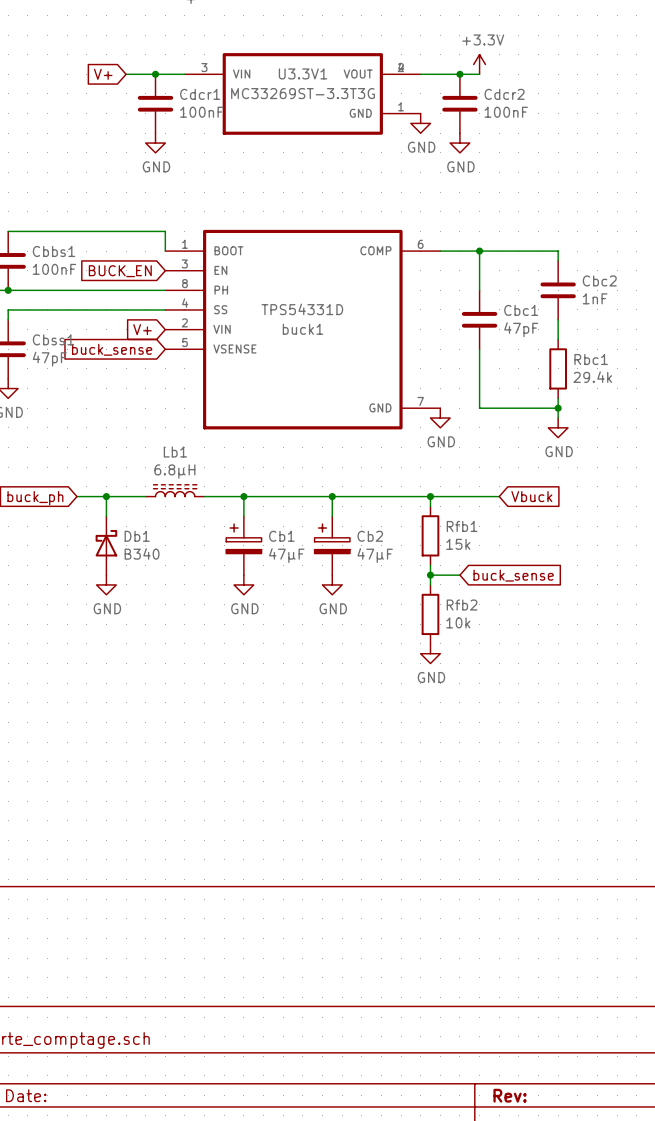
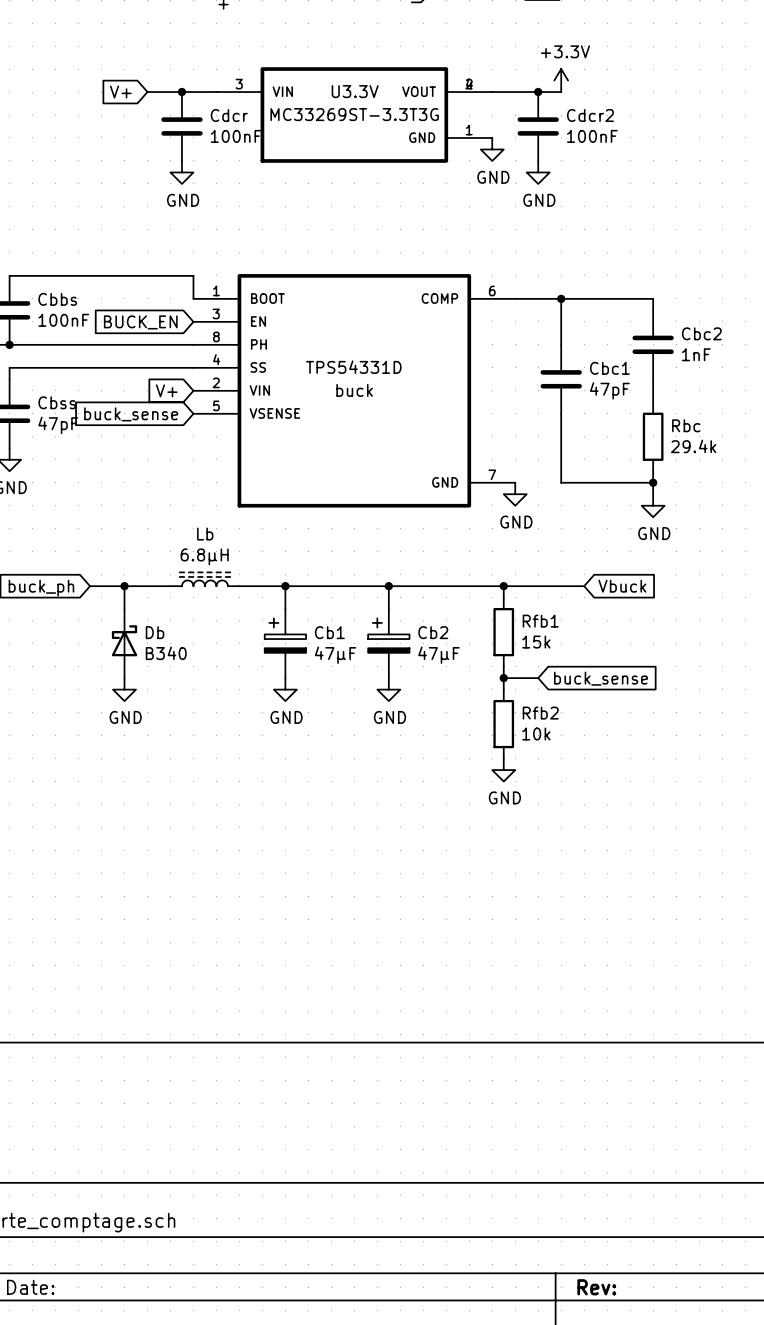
U3.3V1 name: U3.3V1 (303, 73) -> U3.3V (355, 91)
Cdcr1 name: Cdcr1 (200, 94) -> Cdcr (229, 115)
Cbbs1 name: Cbbs1 (54, 251) -> Cbbs (57, 299)
buck1 name: buck1 (303, 329) -> buck (354, 390)
Cbss1 name: Cbss1 (53, 339) -> Cbss (57, 402)
Rbc1 name: Rbc1 (591, 359) -> Rbc (686, 425)
Lb1 name: Lb1 (175, 452) -> Lb (205, 534)
Db1 name: Db1 (137, 536) -> Db (155, 632)

